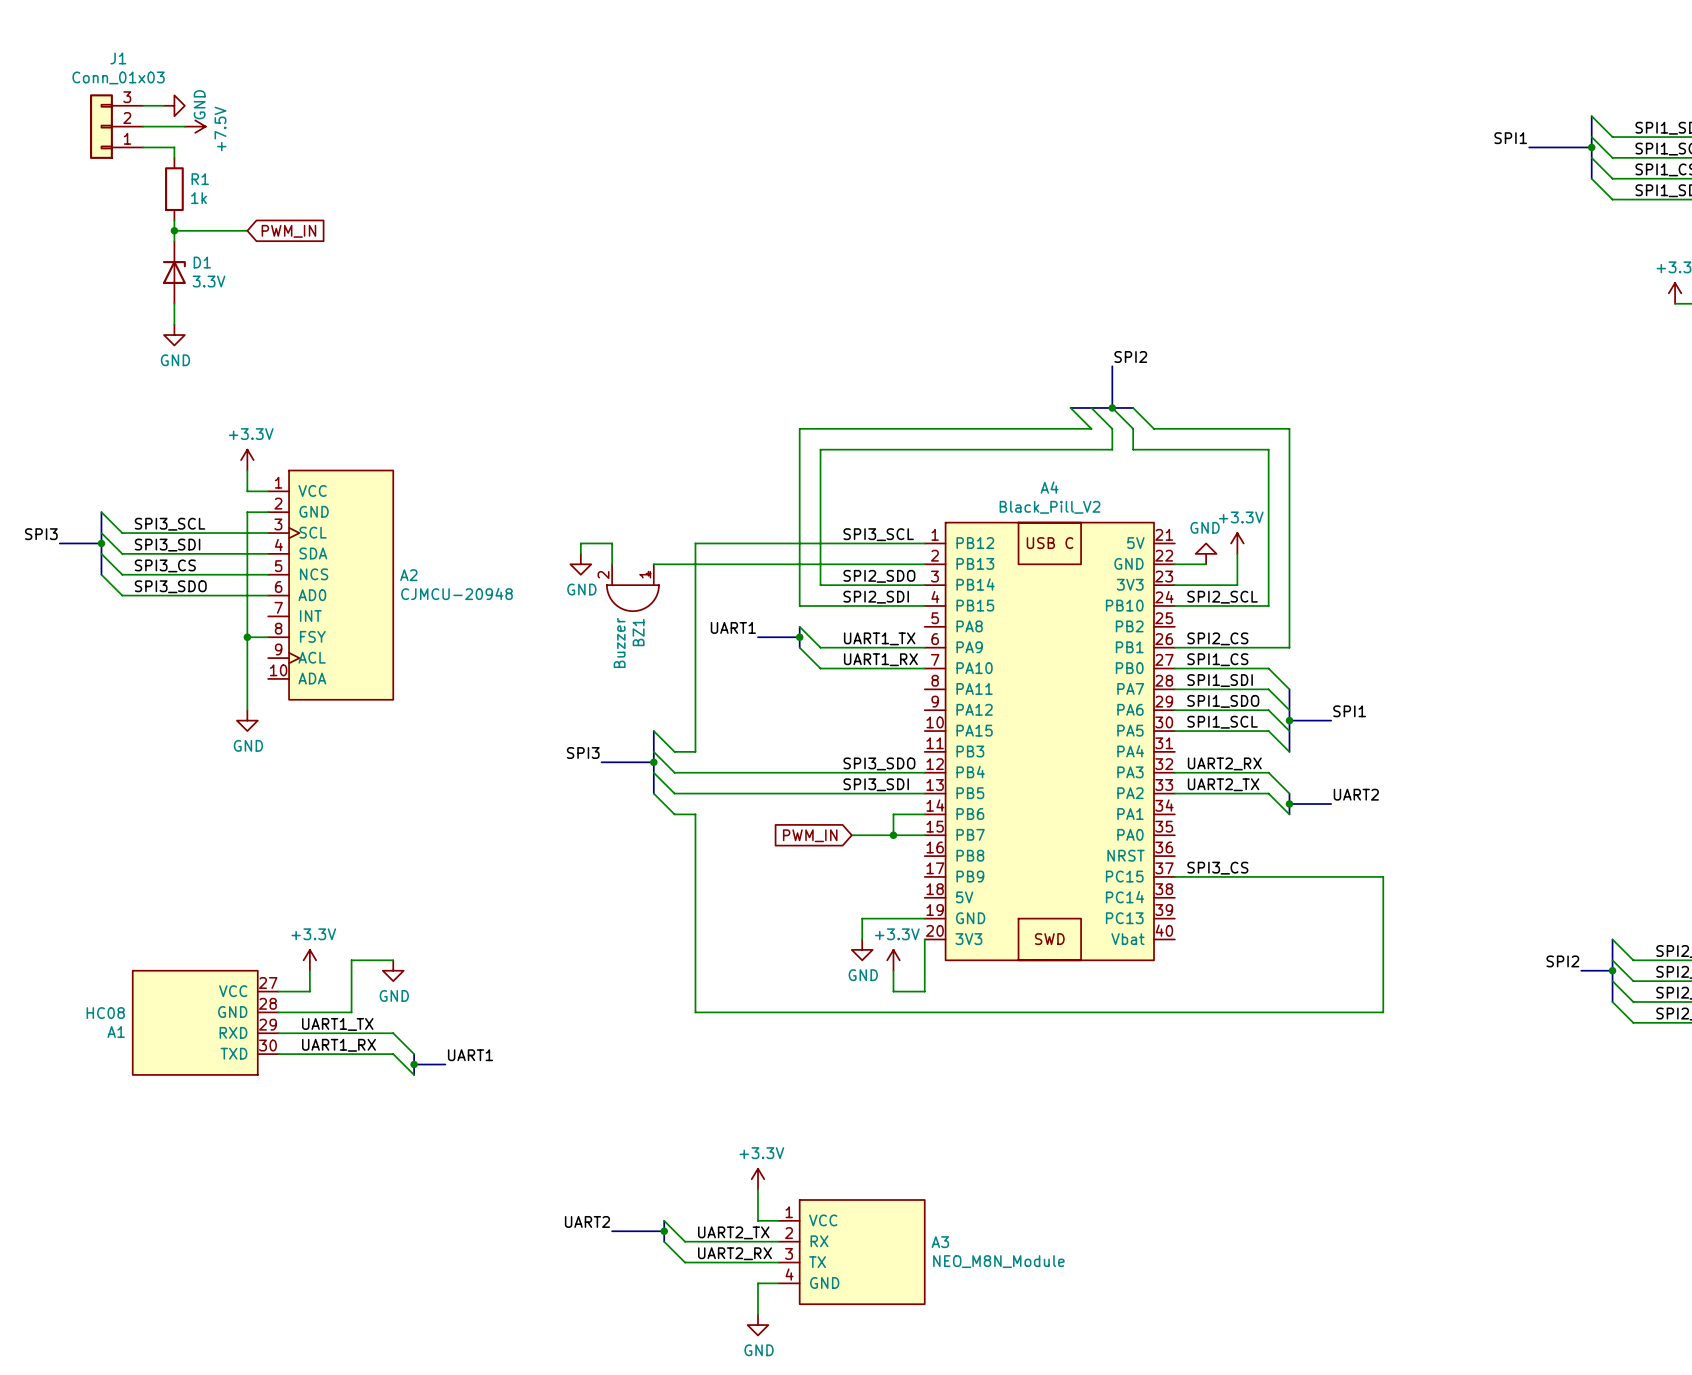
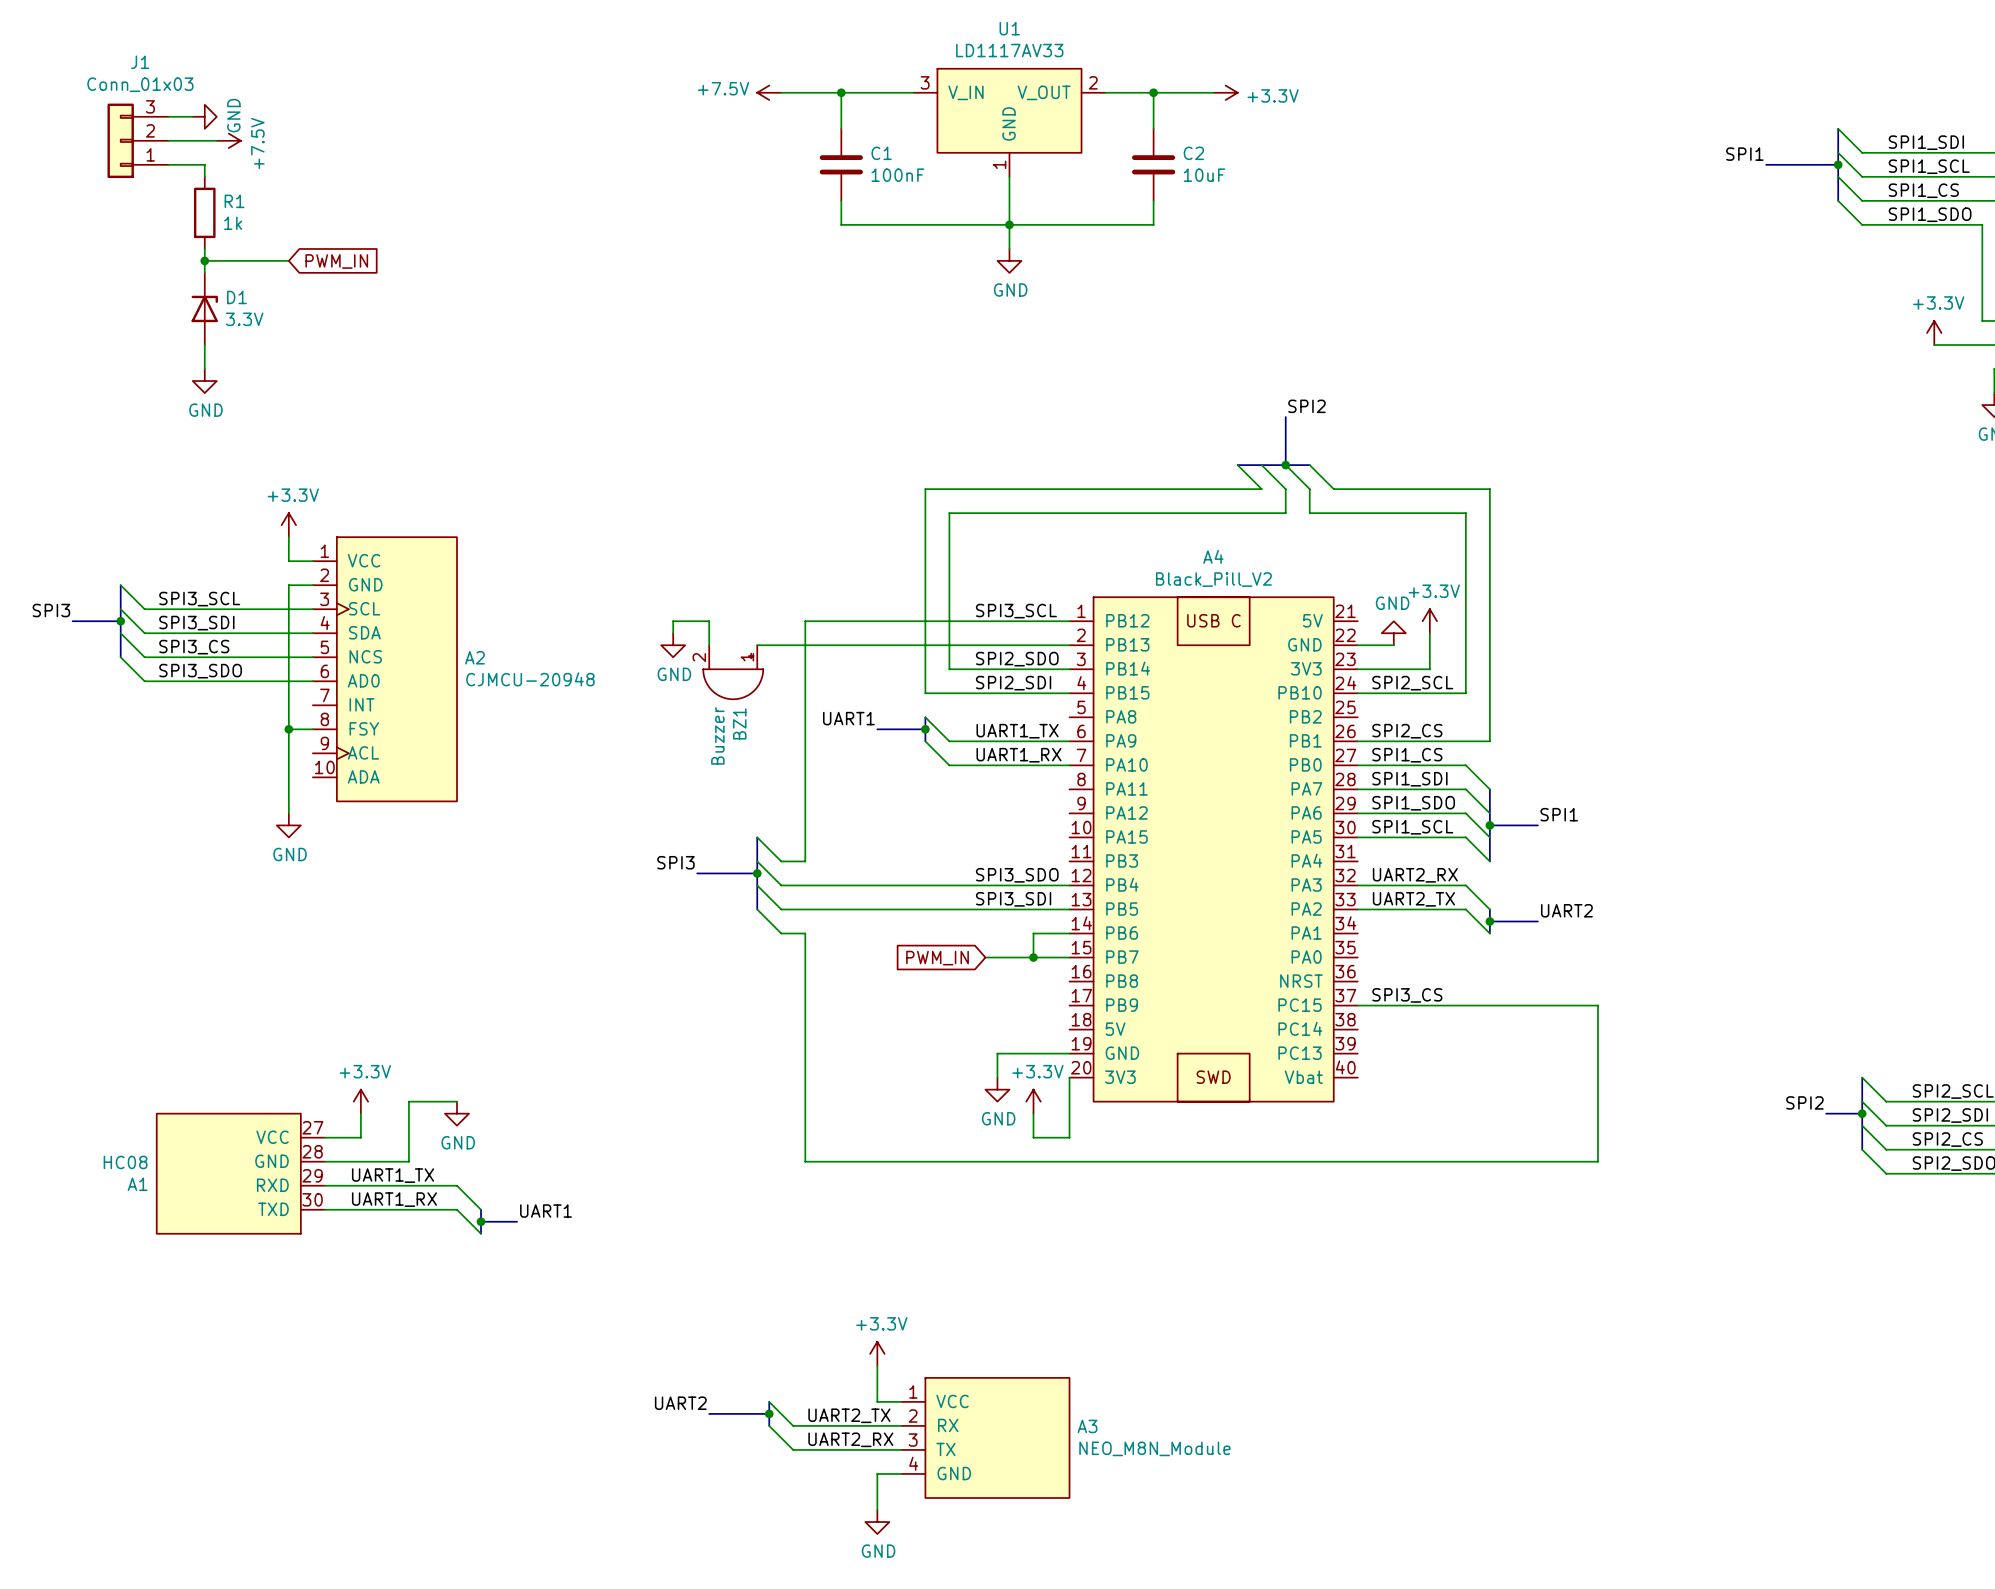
power symbol: none -> +7.5V (769, 92)
wire: none -> (781, 92) (913, 92)
wire: none -> (841, 92) (841, 128)
junction: none -> (841, 92)
wire: none -> (1105, 92) (1213, 92)
wire: none -> (1153, 92) (1153, 128)
junction: none -> (1153, 92)
power symbol: none -> +3.3V (1225, 92)
U1: none -> LD1117AV33 (1009, 122)
C1: none -> 100nF (841, 164)
C2: none -> 10uF (1153, 164)
wire: none -> (1009, 176) (1009, 248)
wire: none -> (841, 200) (841, 224) (1153, 224) (1153, 200)
junction: none -> (1009, 224)
power symbol: none -> GND (1009, 260)

